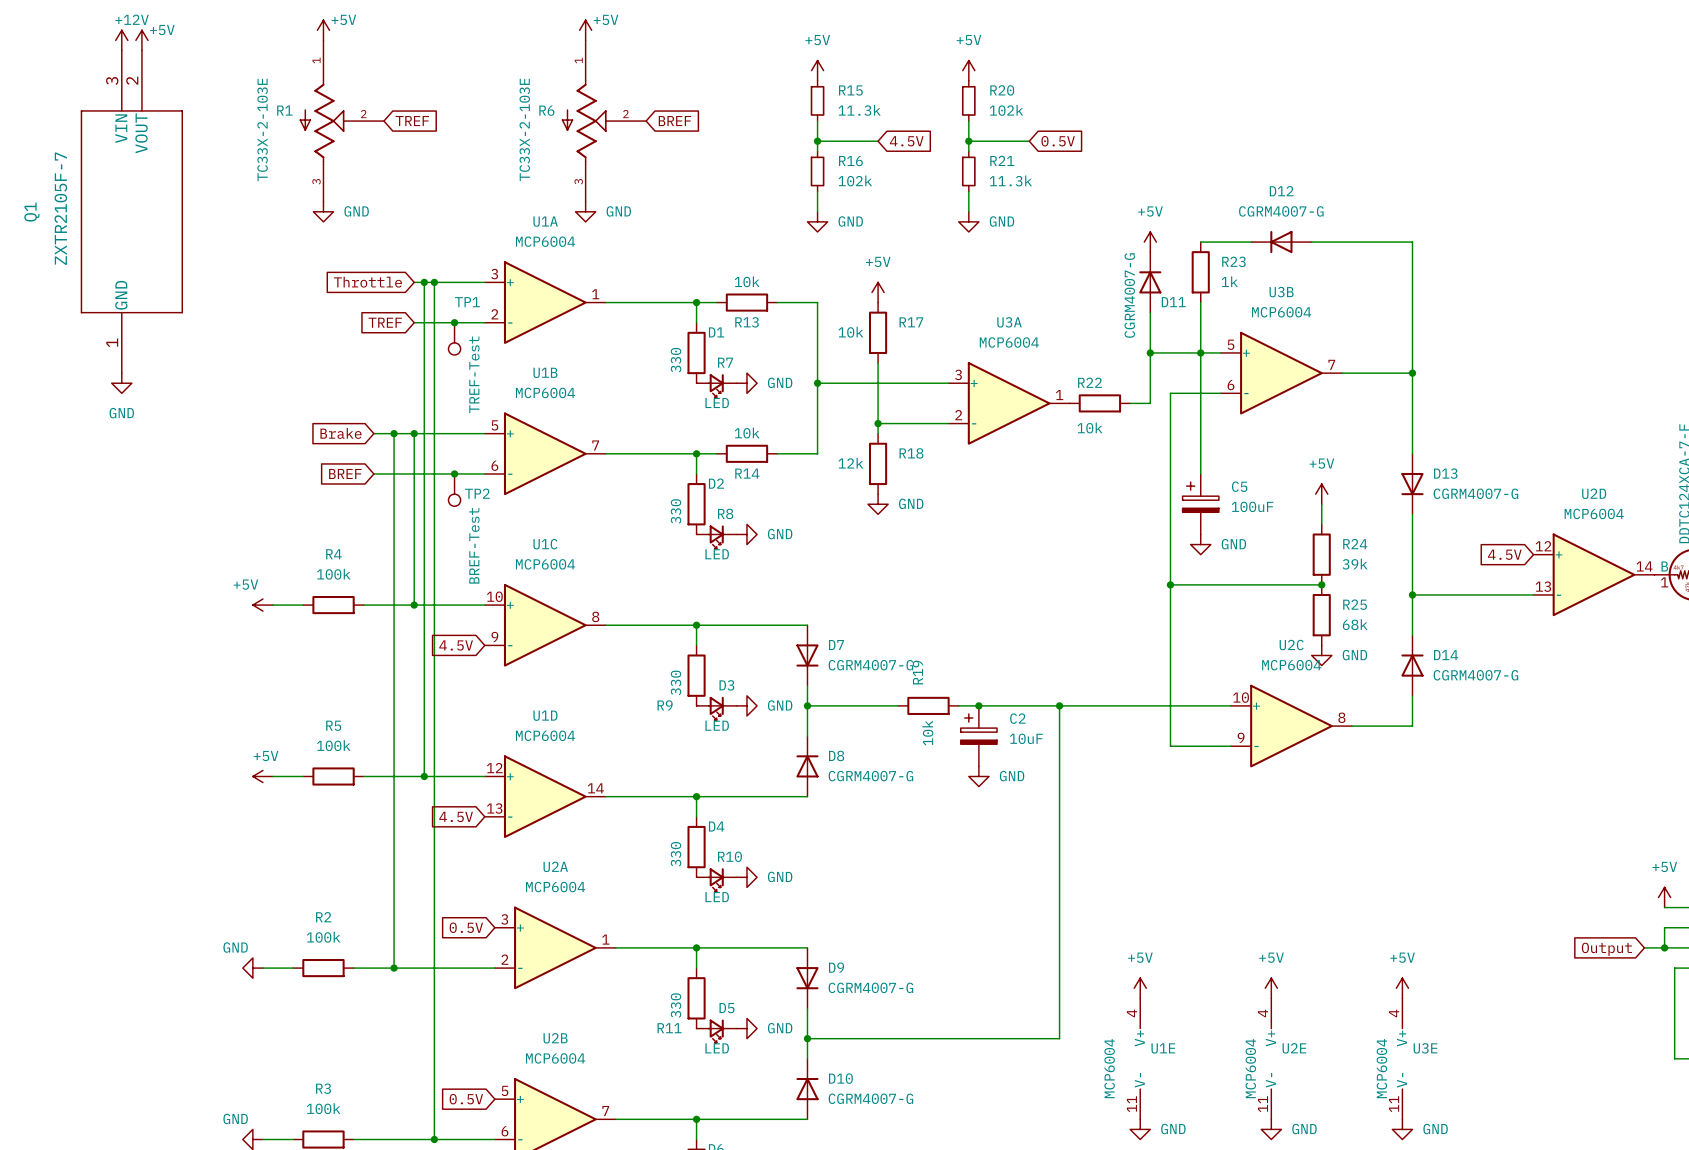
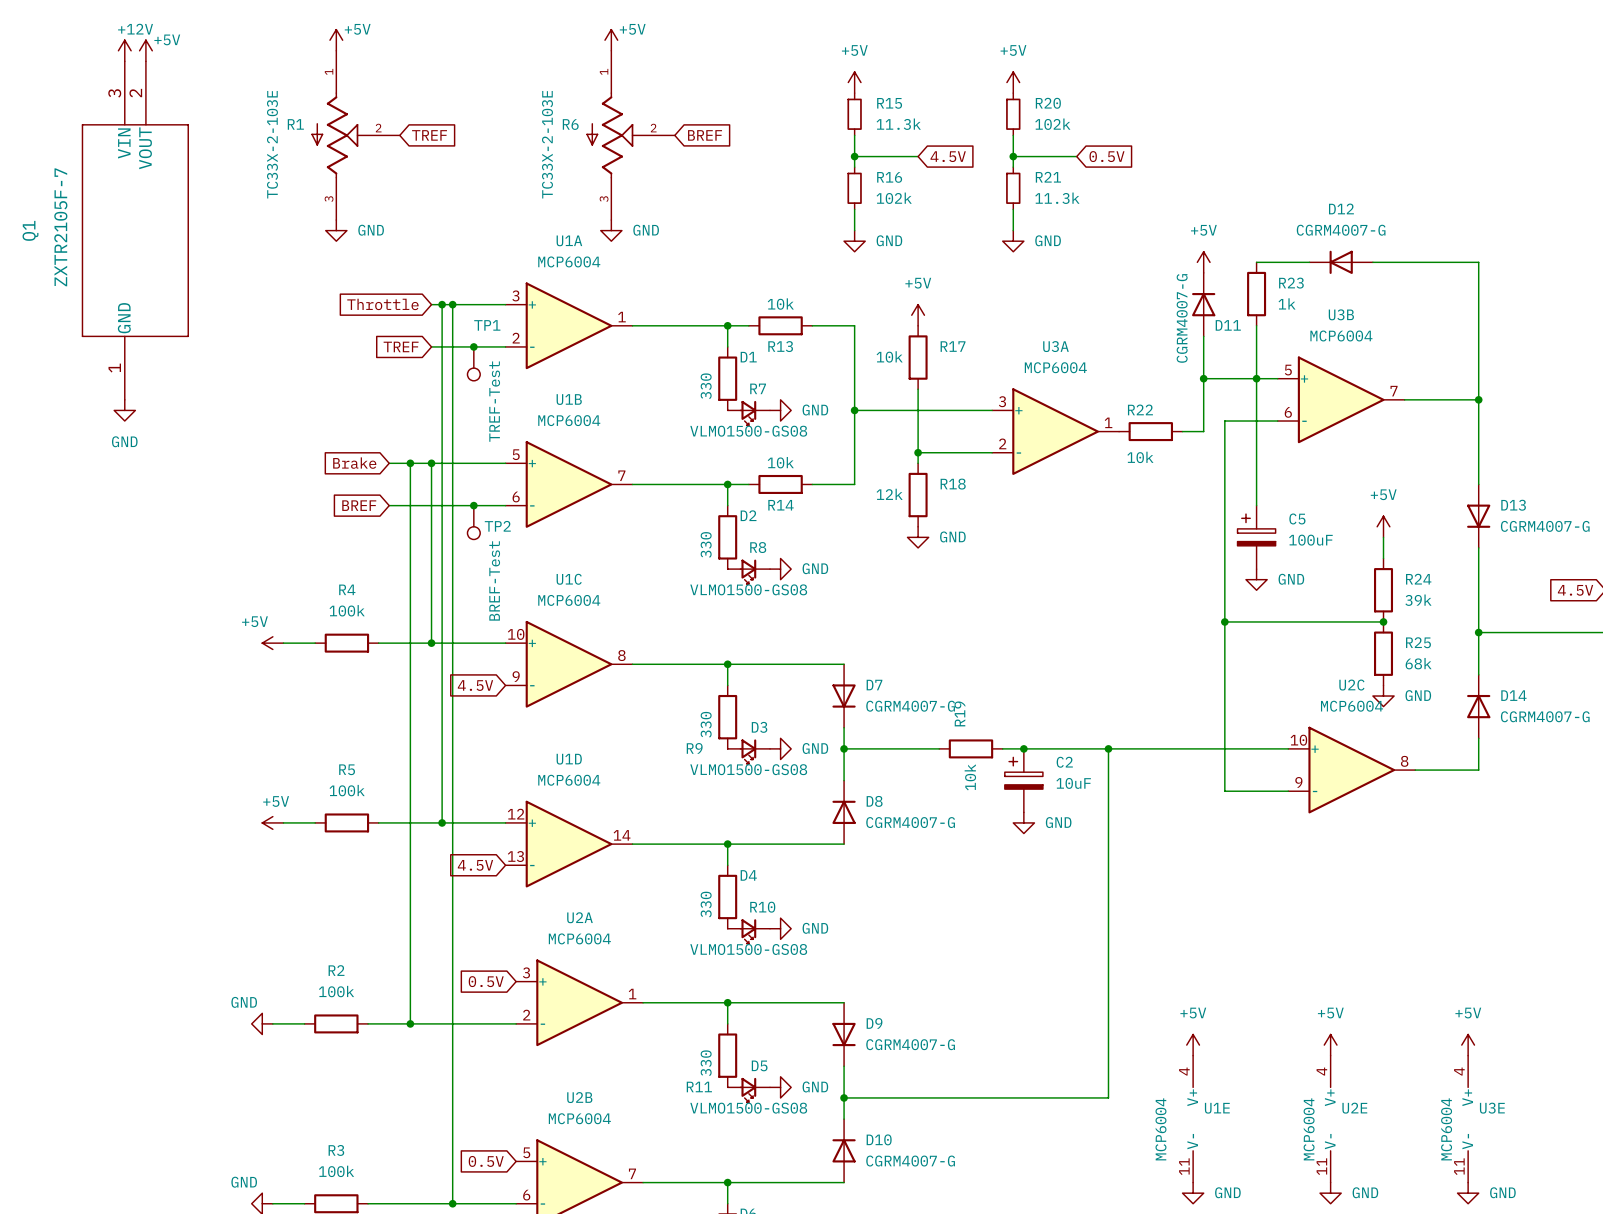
D1 value: LED (717, 403) -> VLMO1500-GS08 (748, 431)
D2 value: LED (717, 554) -> VLMO1500-GS08 (748, 589)
D3 value: LED (717, 725) -> VLMO1500-GS08 (748, 769)
D4 value: LED (717, 897) -> VLMO1500-GS08 (748, 949)
D5 value: LED (717, 1048) -> VLMO1500-GS08 (748, 1108)

